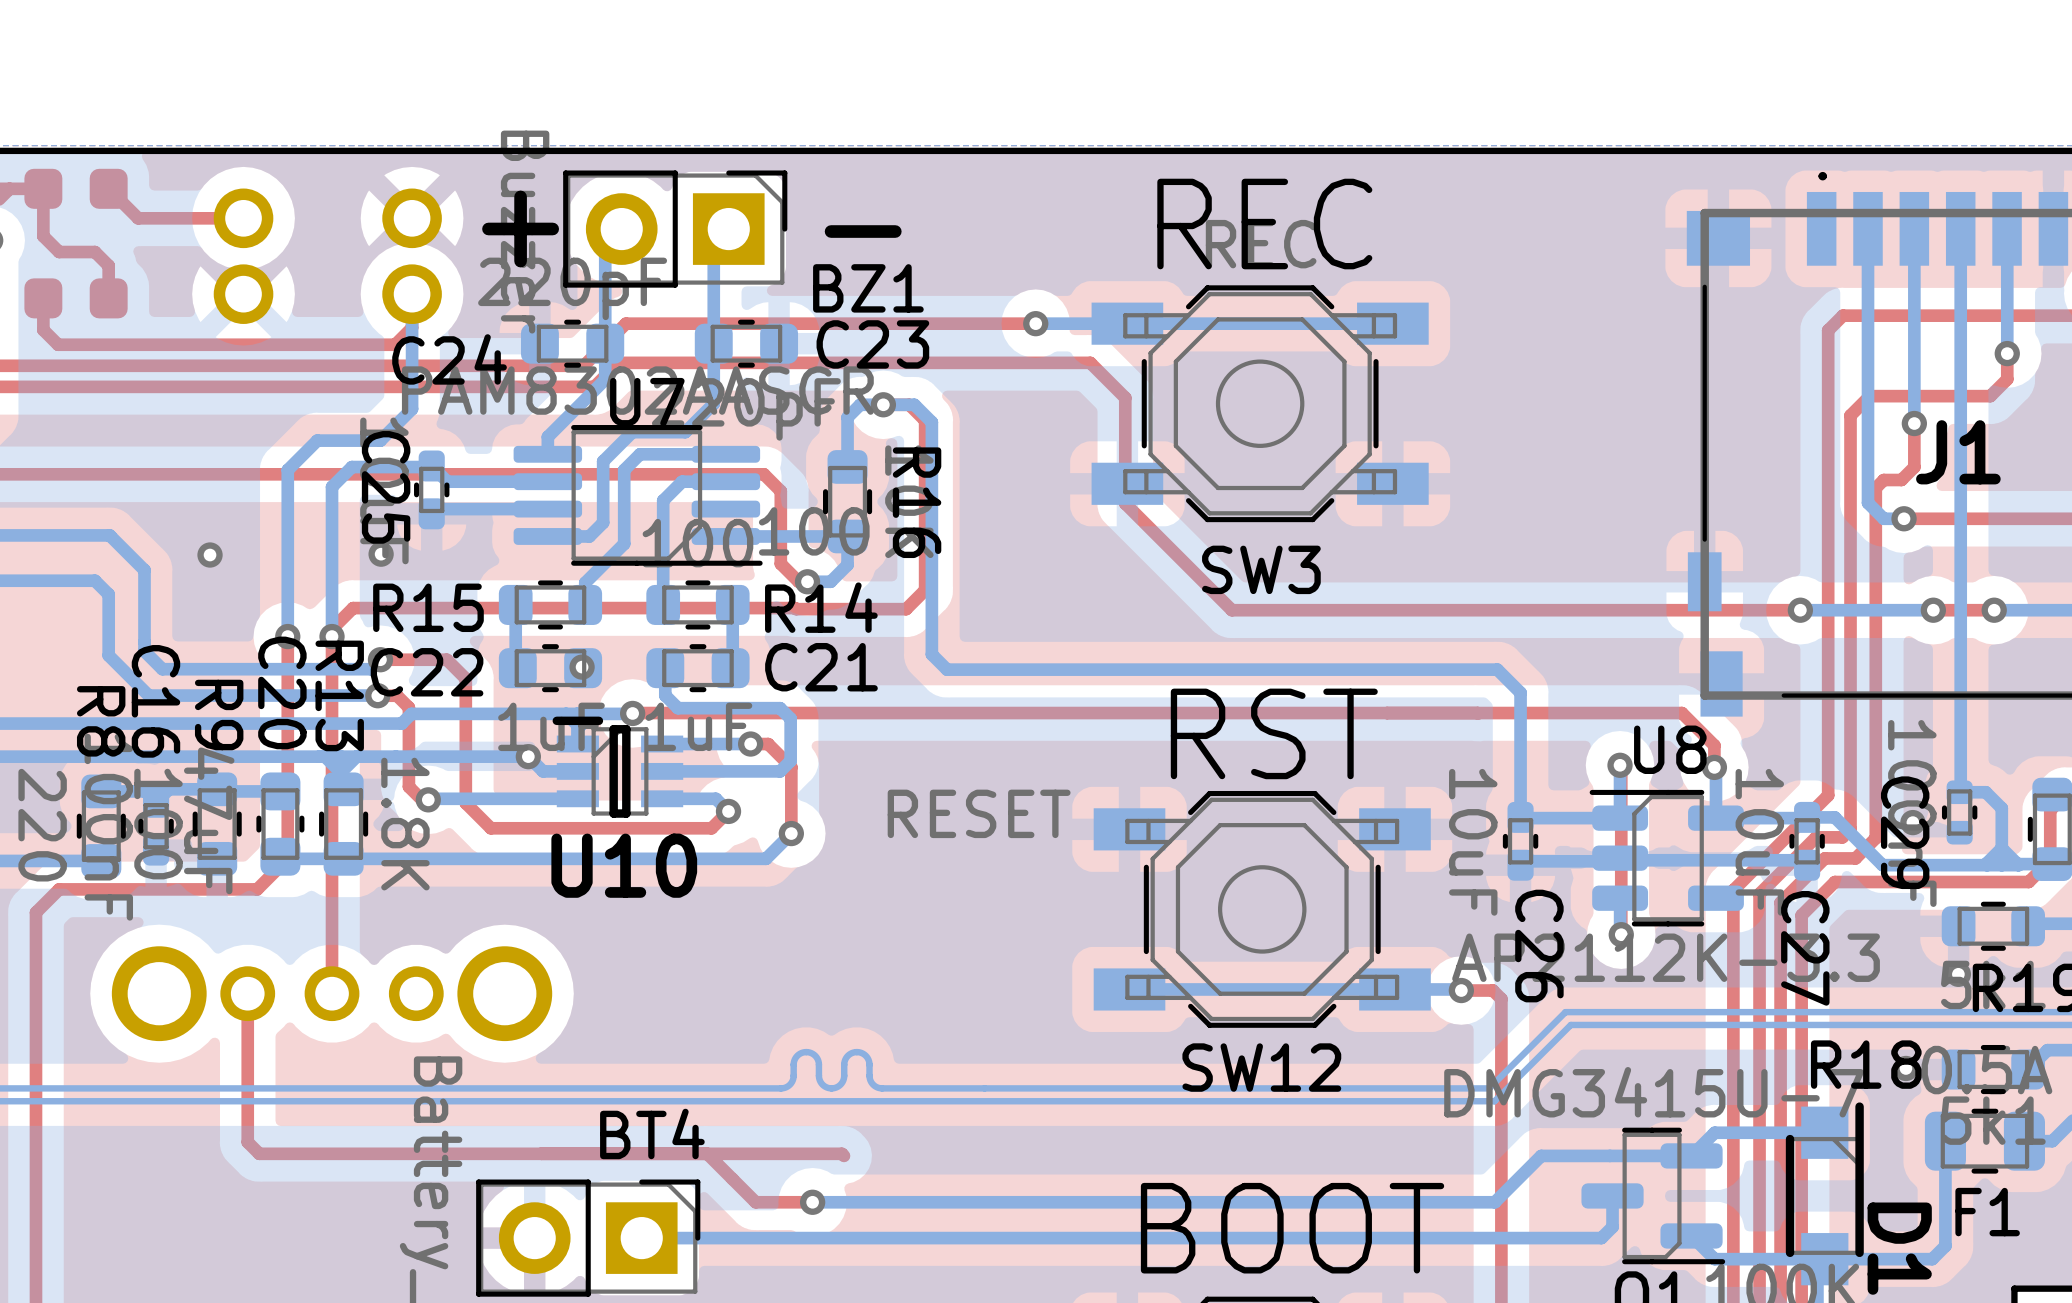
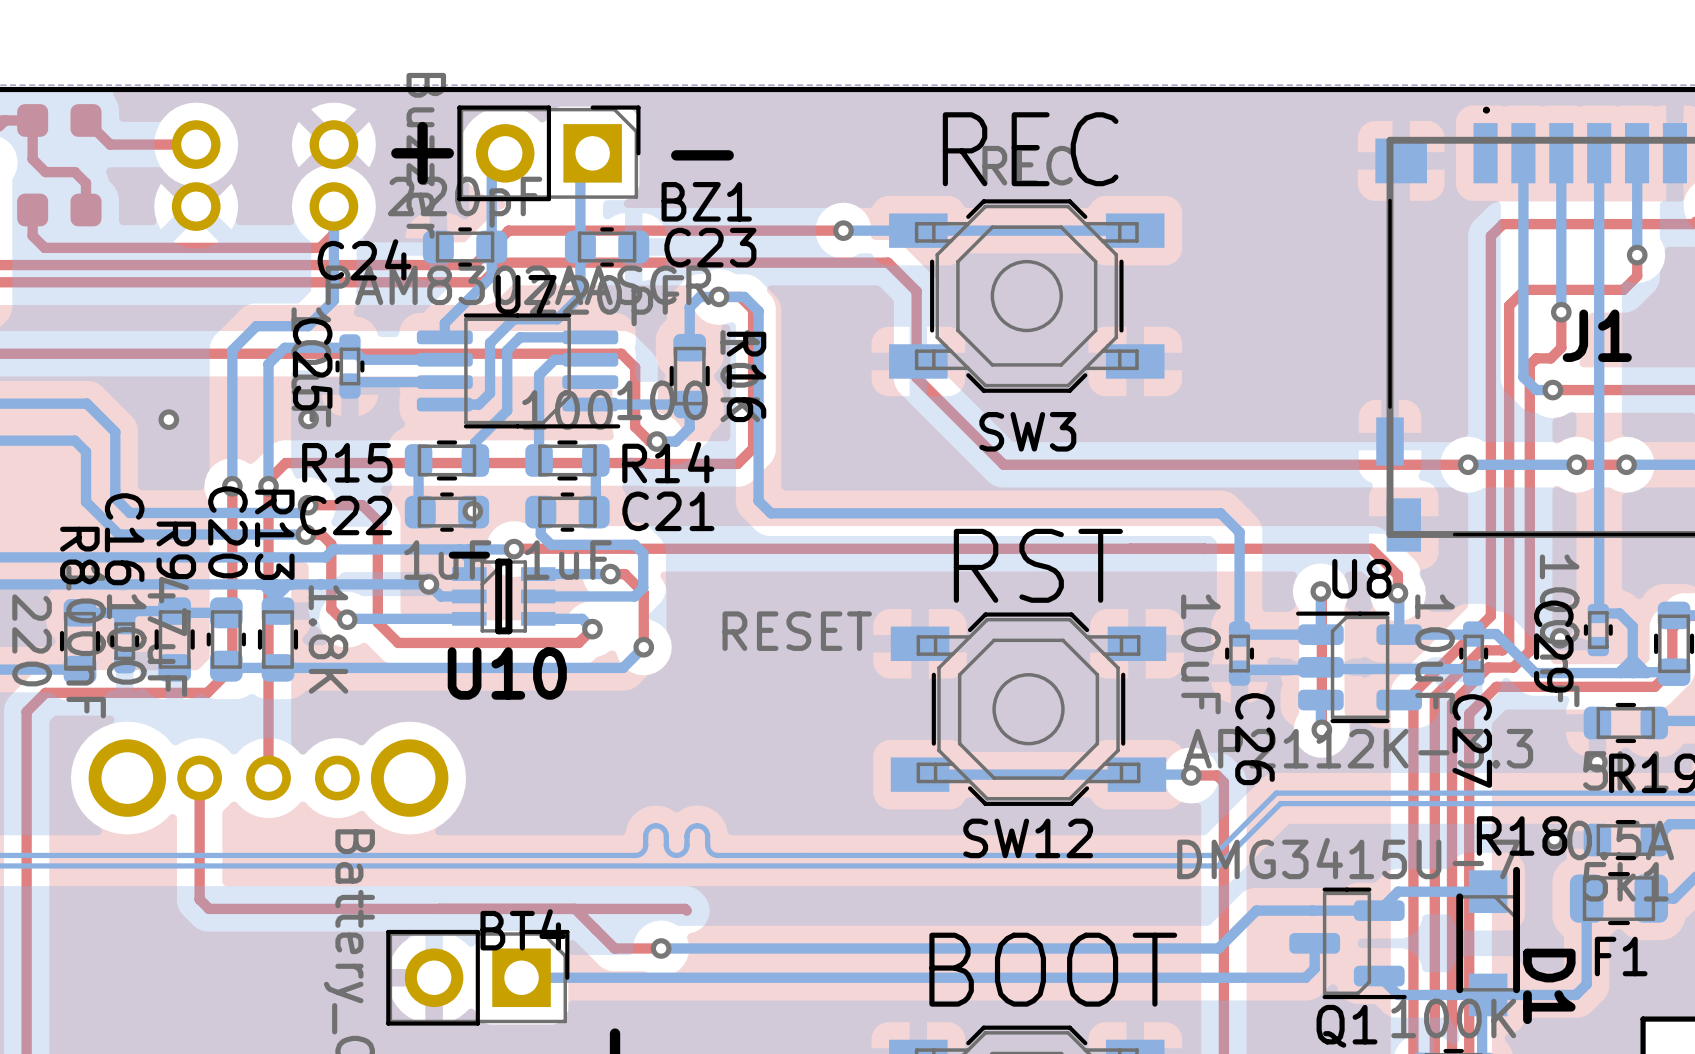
BT4 name position: BT4 (652, 1133) -> BT4 (523, 929)

